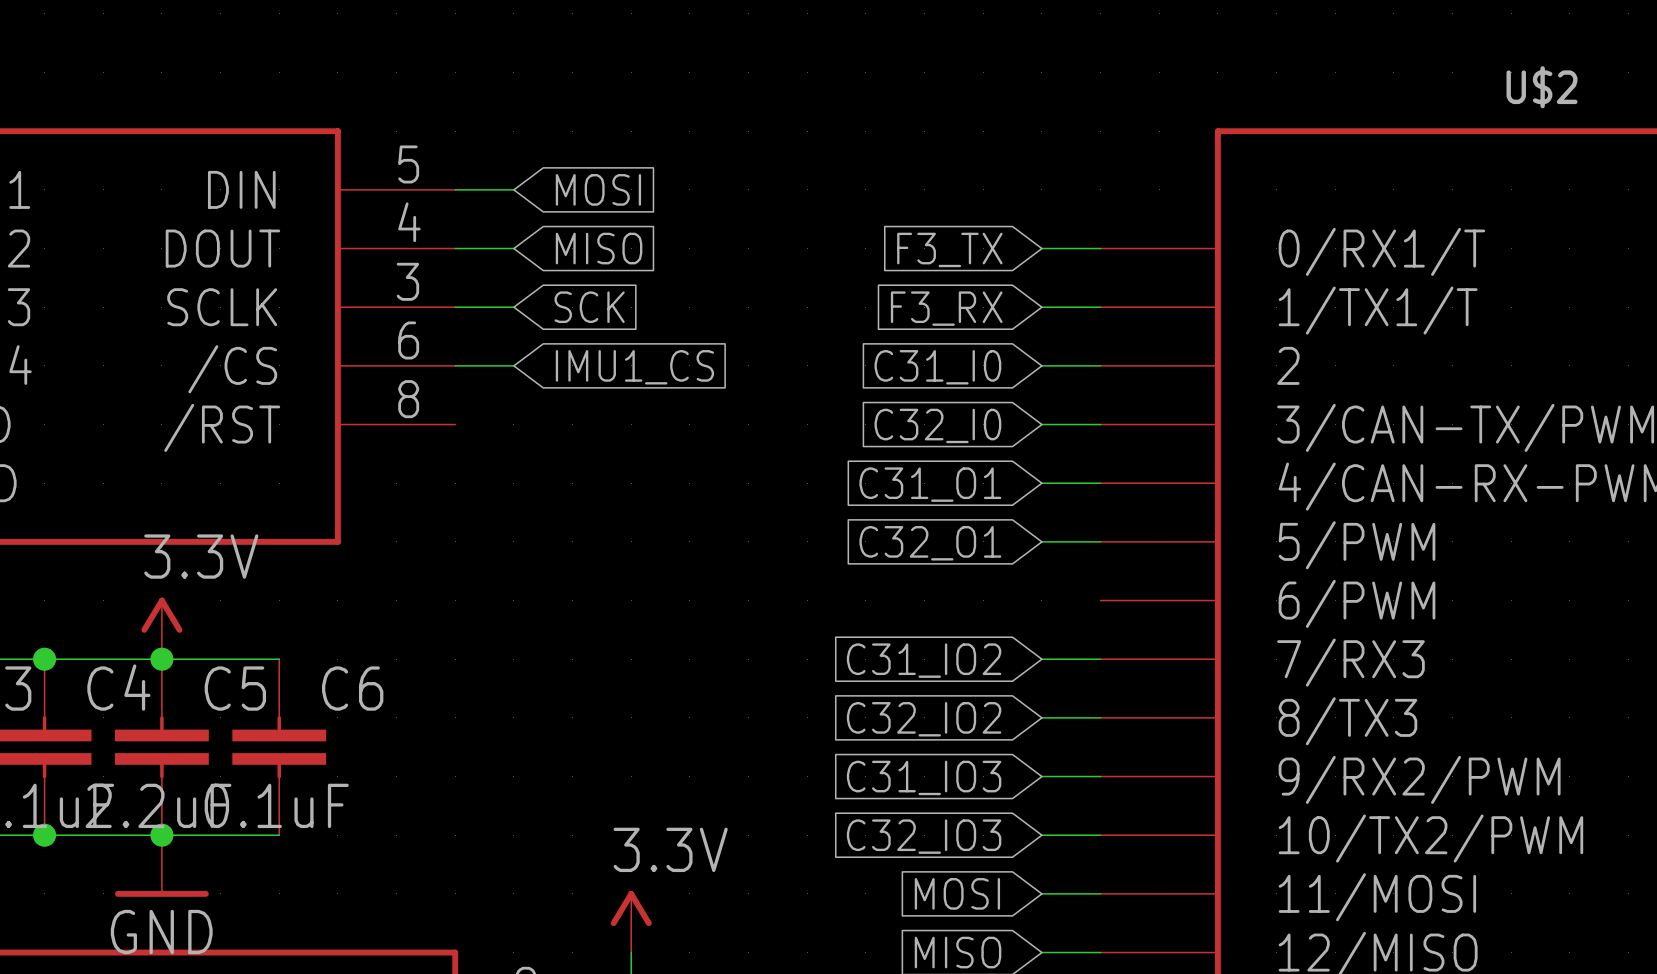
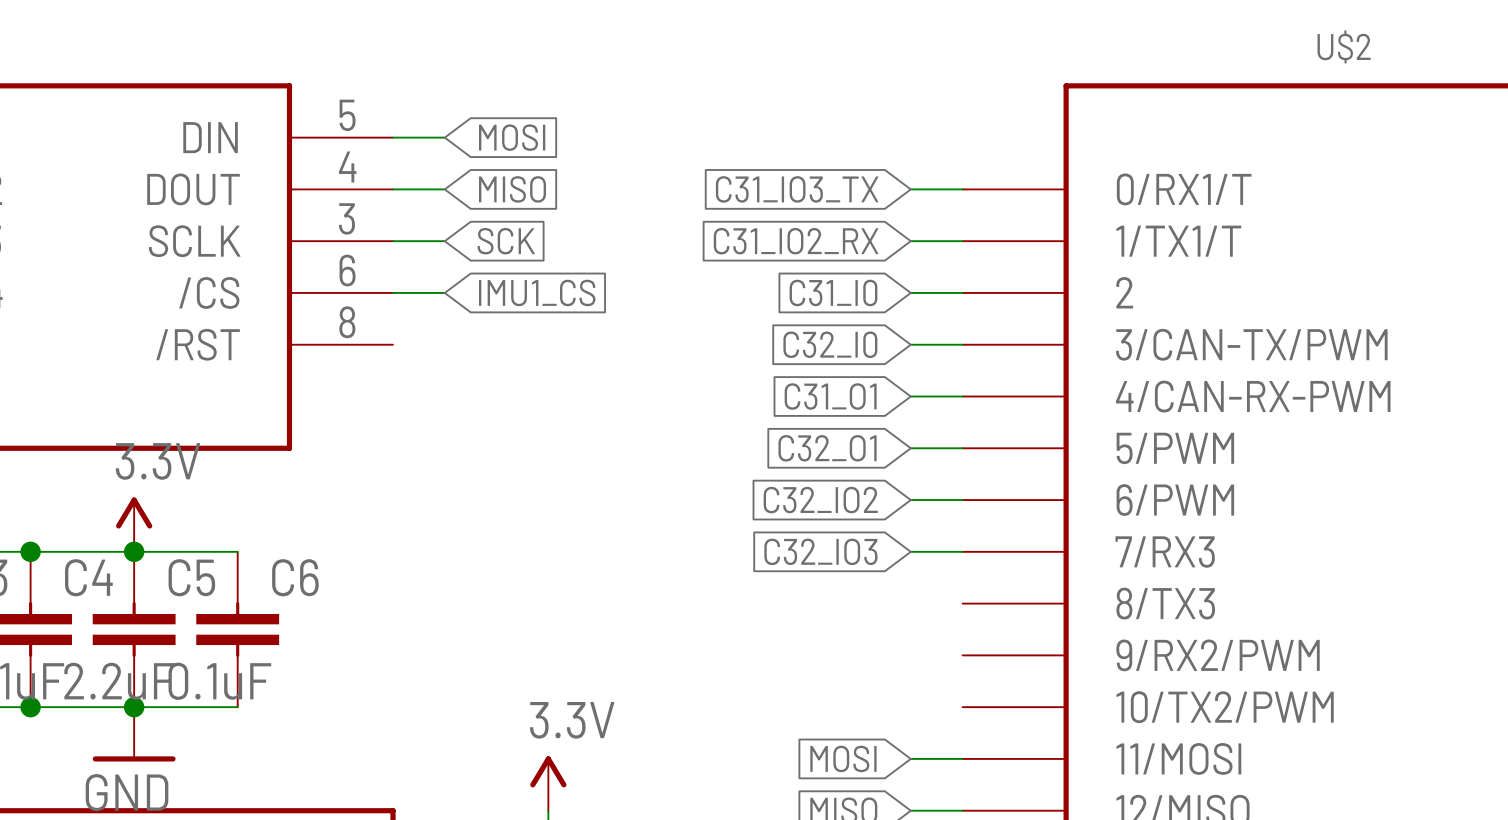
global label: F3_TX (949, 249) -> C31_IO3_TX (797, 189)
global label: F3_RX (946, 308) -> C31_IO2_RX (796, 241)
global label: C31_IO2 (924, 660) -> C32_IO3 (820, 551)
wire: (1041, 717) (1100, 717) -> (910, 500) (962, 500)
global label position: C32_IO2 (924, 719) -> C32_IO2 (820, 500)
wire: (1041, 776) (1100, 776) -> none
global label: C31_IO3 (924, 777) -> none
wire: (1041, 835) (1100, 835) -> none
global label: C32_IO3 (924, 836) -> none

